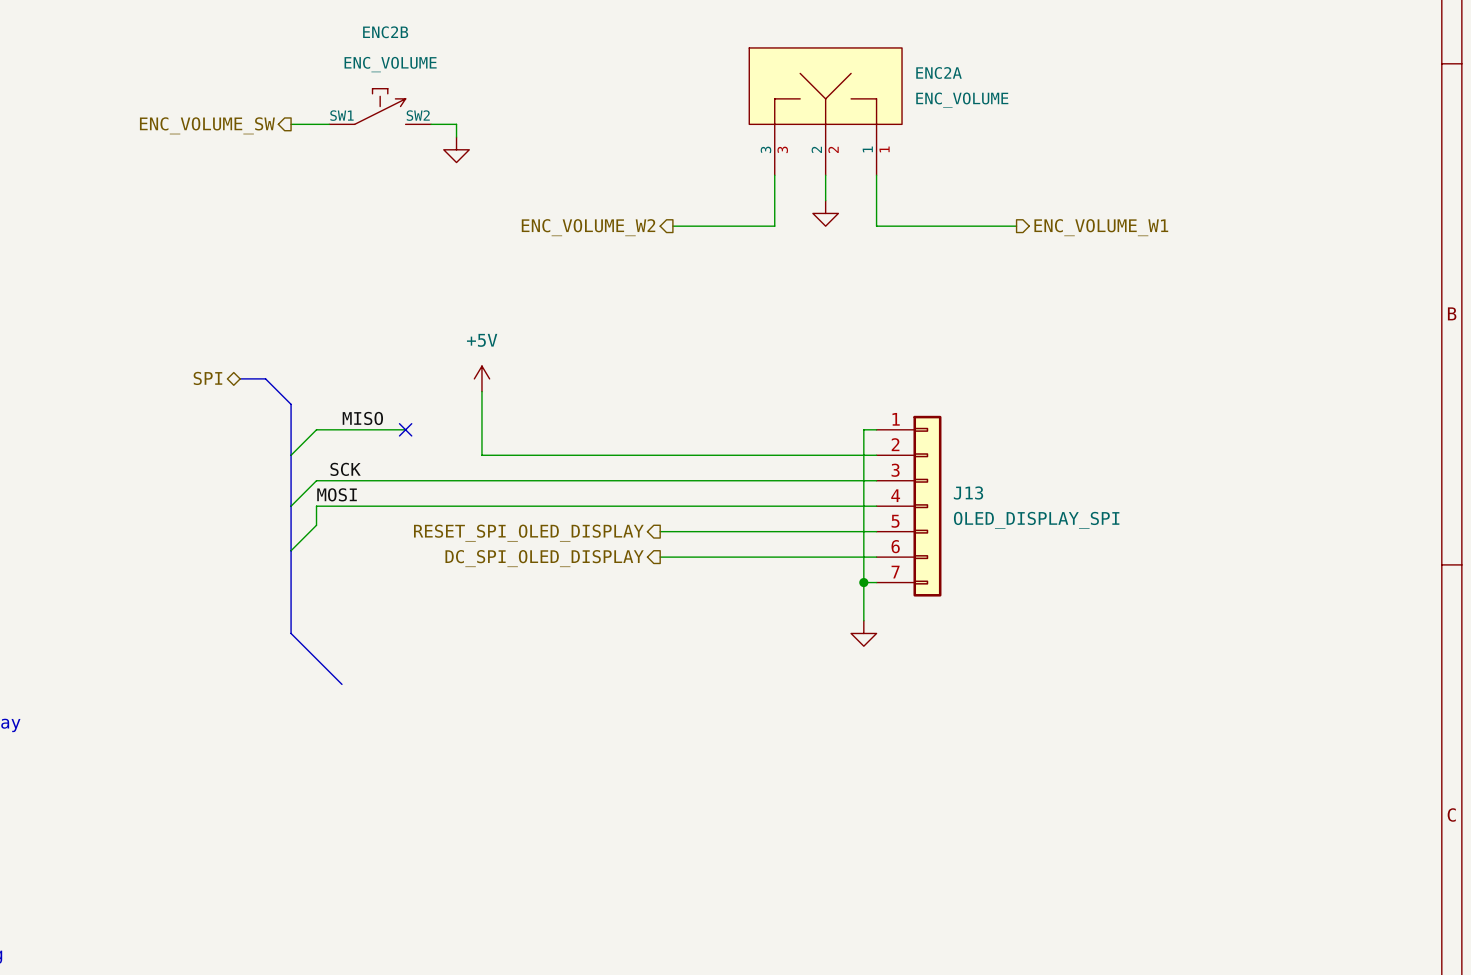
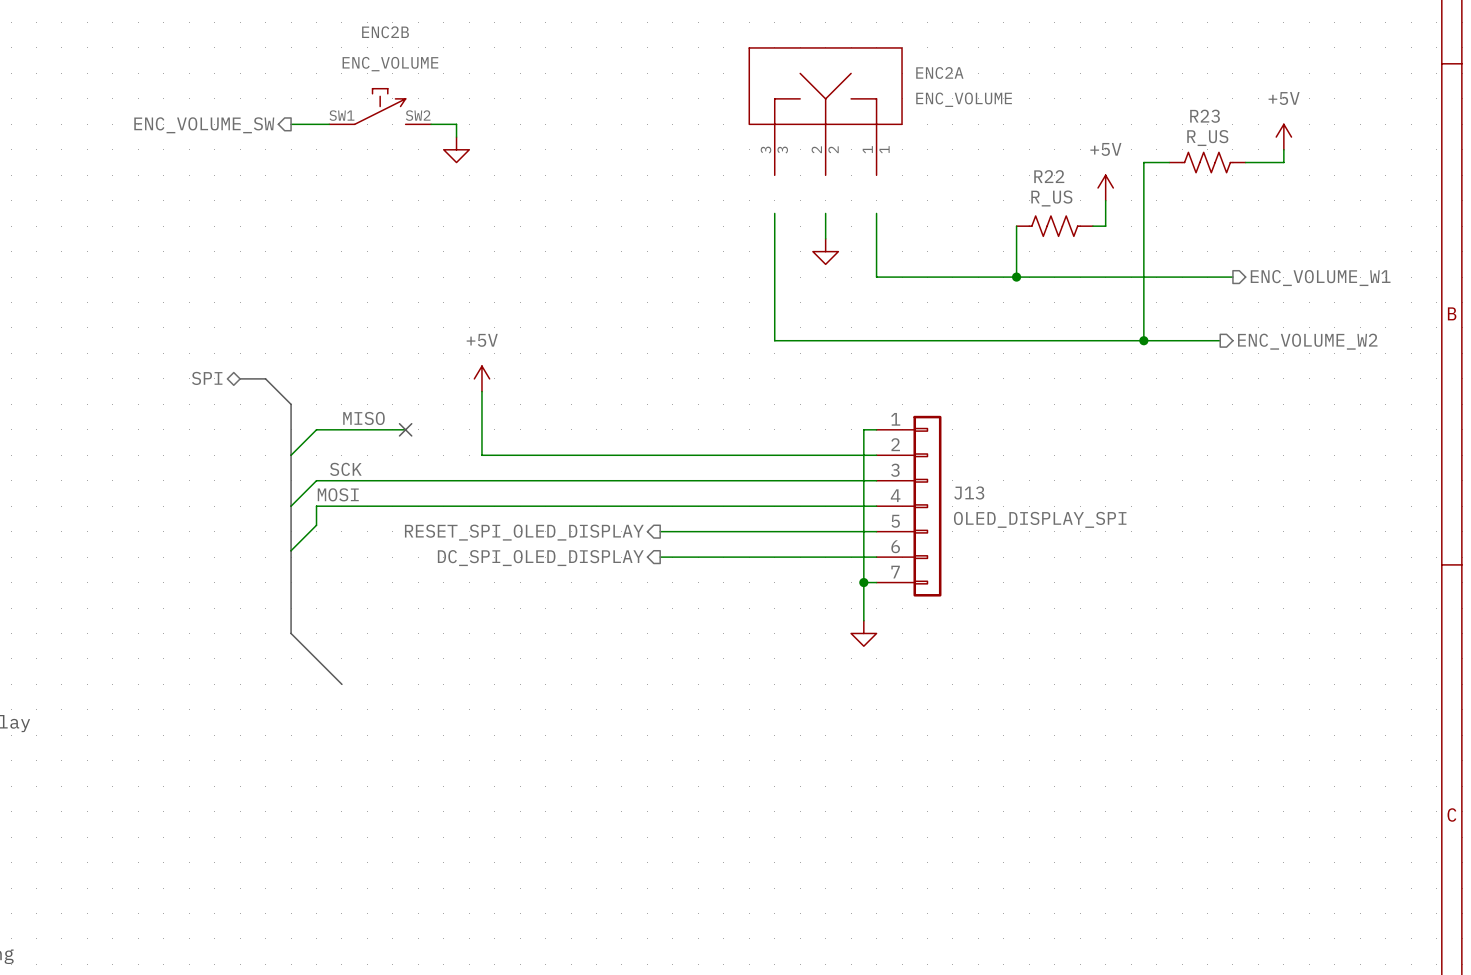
power symbol: none -> +5V (1283, 137)
wire: none -> (1283, 149) (1283, 162) (1245, 162)
wire: none -> (1169, 162) (1143, 162) (1143, 340)
R23: none -> R_US (1207, 162)
wire: (774, 175) (774, 213) -> none
wire: (825, 175) (825, 200) -> (825, 213) (825, 238)
wire: (876, 175) (876, 213) -> none
power symbol: none -> +5V (1105, 187)
wire: none -> (1105, 200) (1105, 226) (1092, 226)
power symbol position: (825, 213) -> (825, 251)
wire: (672, 226) (774, 226) -> (1220, 340) (774, 340) (774, 226)
wire: (876, 226) (1016, 226) -> (1016, 277) (1016, 226)
wire: none -> (876, 226) (876, 277) (1232, 277)
R22: none -> R_US (1054, 226)
hierarchical label: ENC_VOLUME_W2 (588, 227) -> none
hierarchical label position: ENC_VOLUME_W1 (1101, 227) -> ENC_VOLUME_W1 (1320, 278)
junction: none -> (1016, 277)
junction: none -> (1143, 340)
hierarchical label: none -> ENC_VOLUME_W2 (1307, 341)

